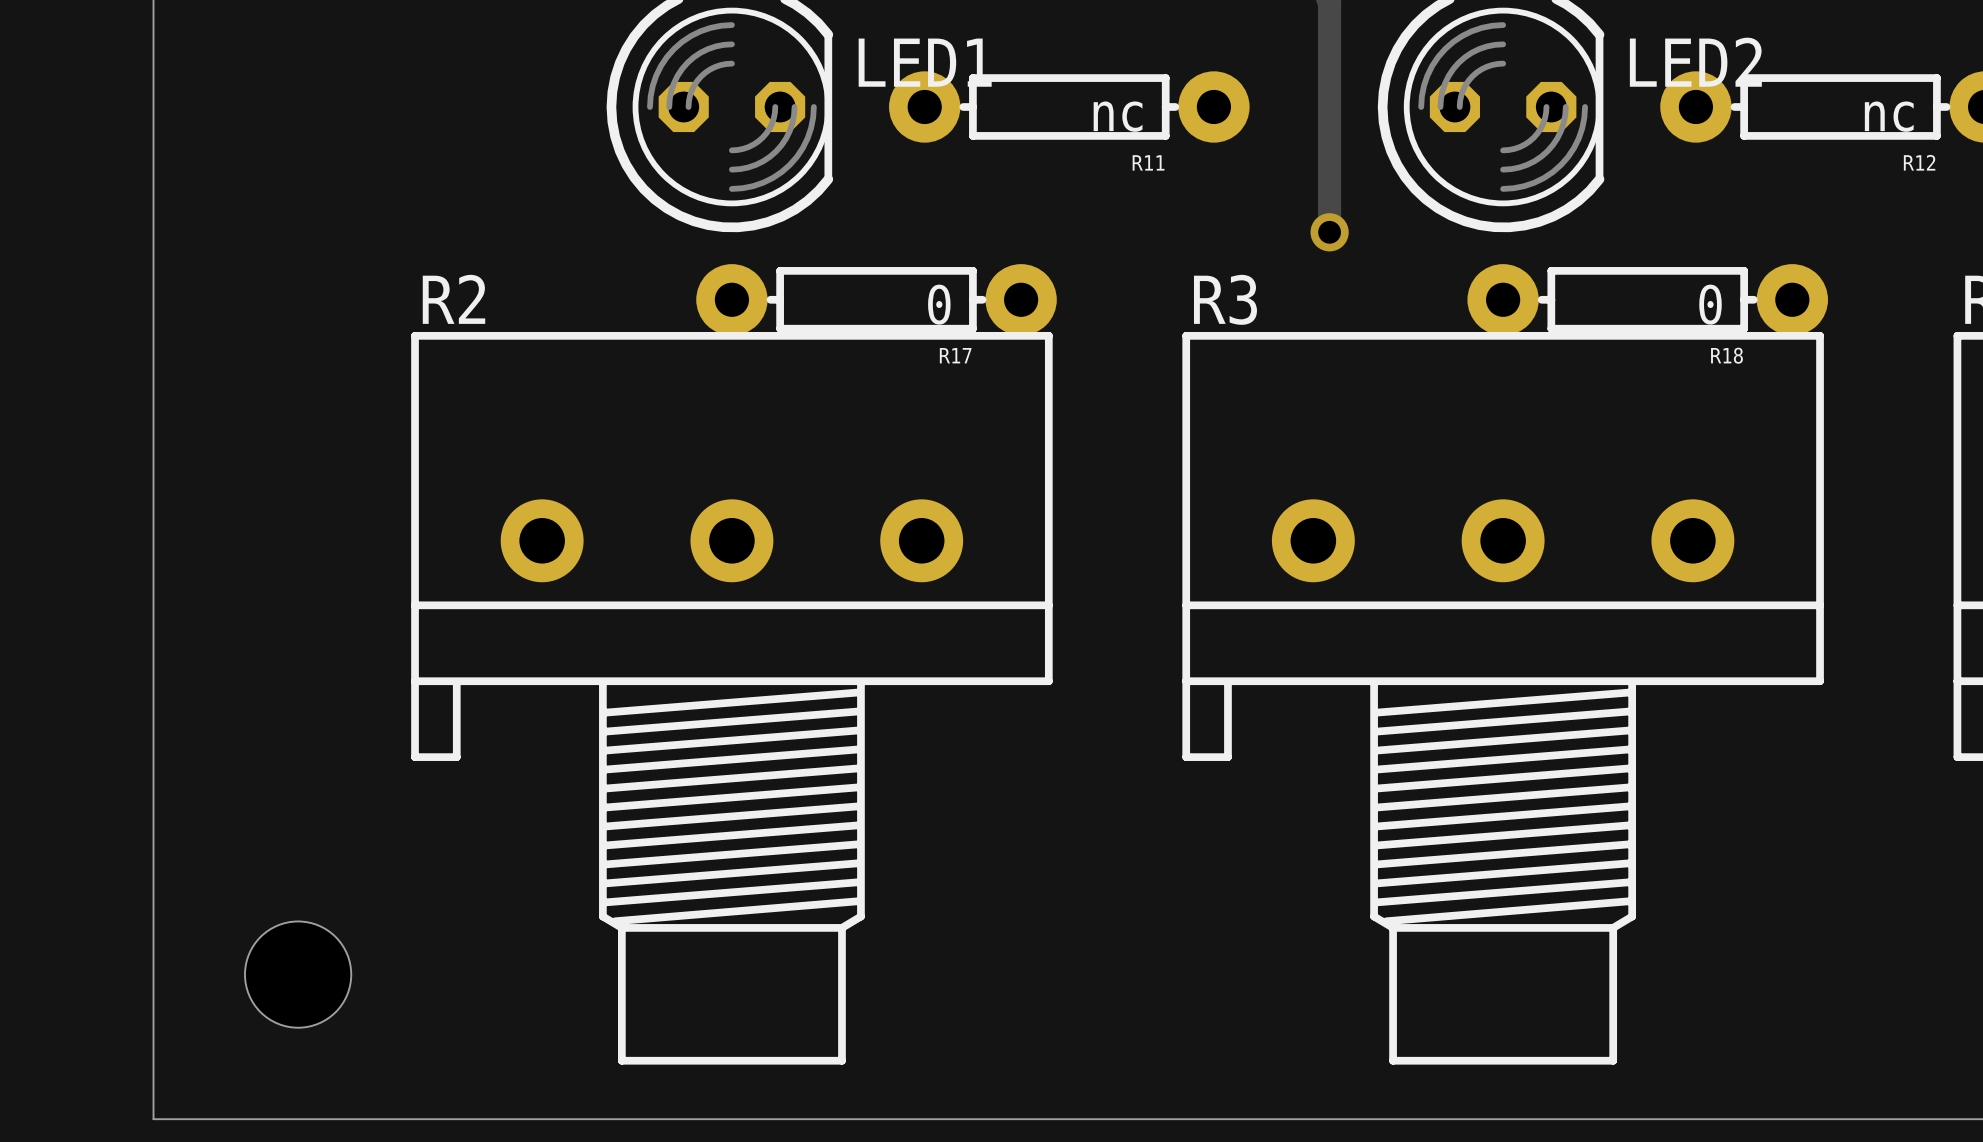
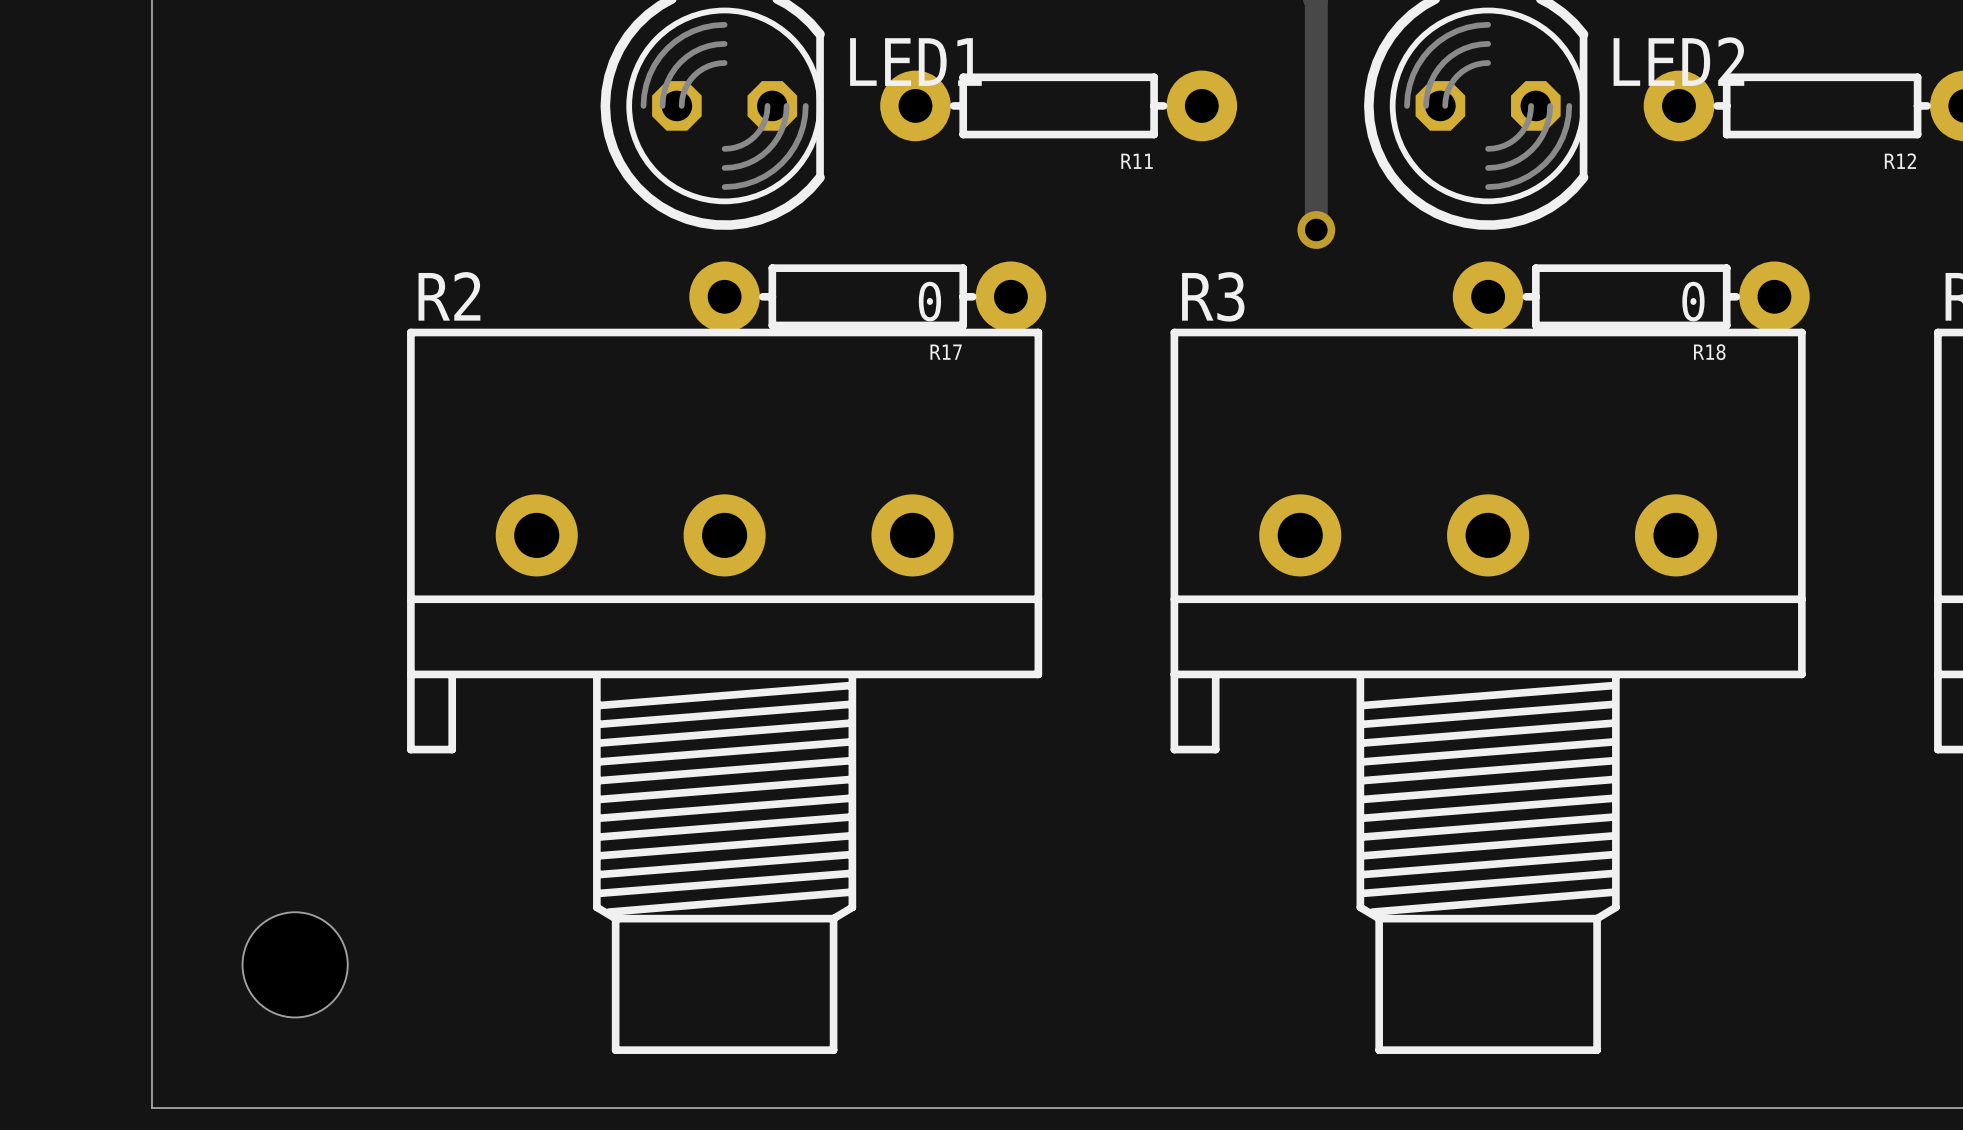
R11 value: nc (1118, 116) -> none
R12 value: nc (1889, 116) -> none

